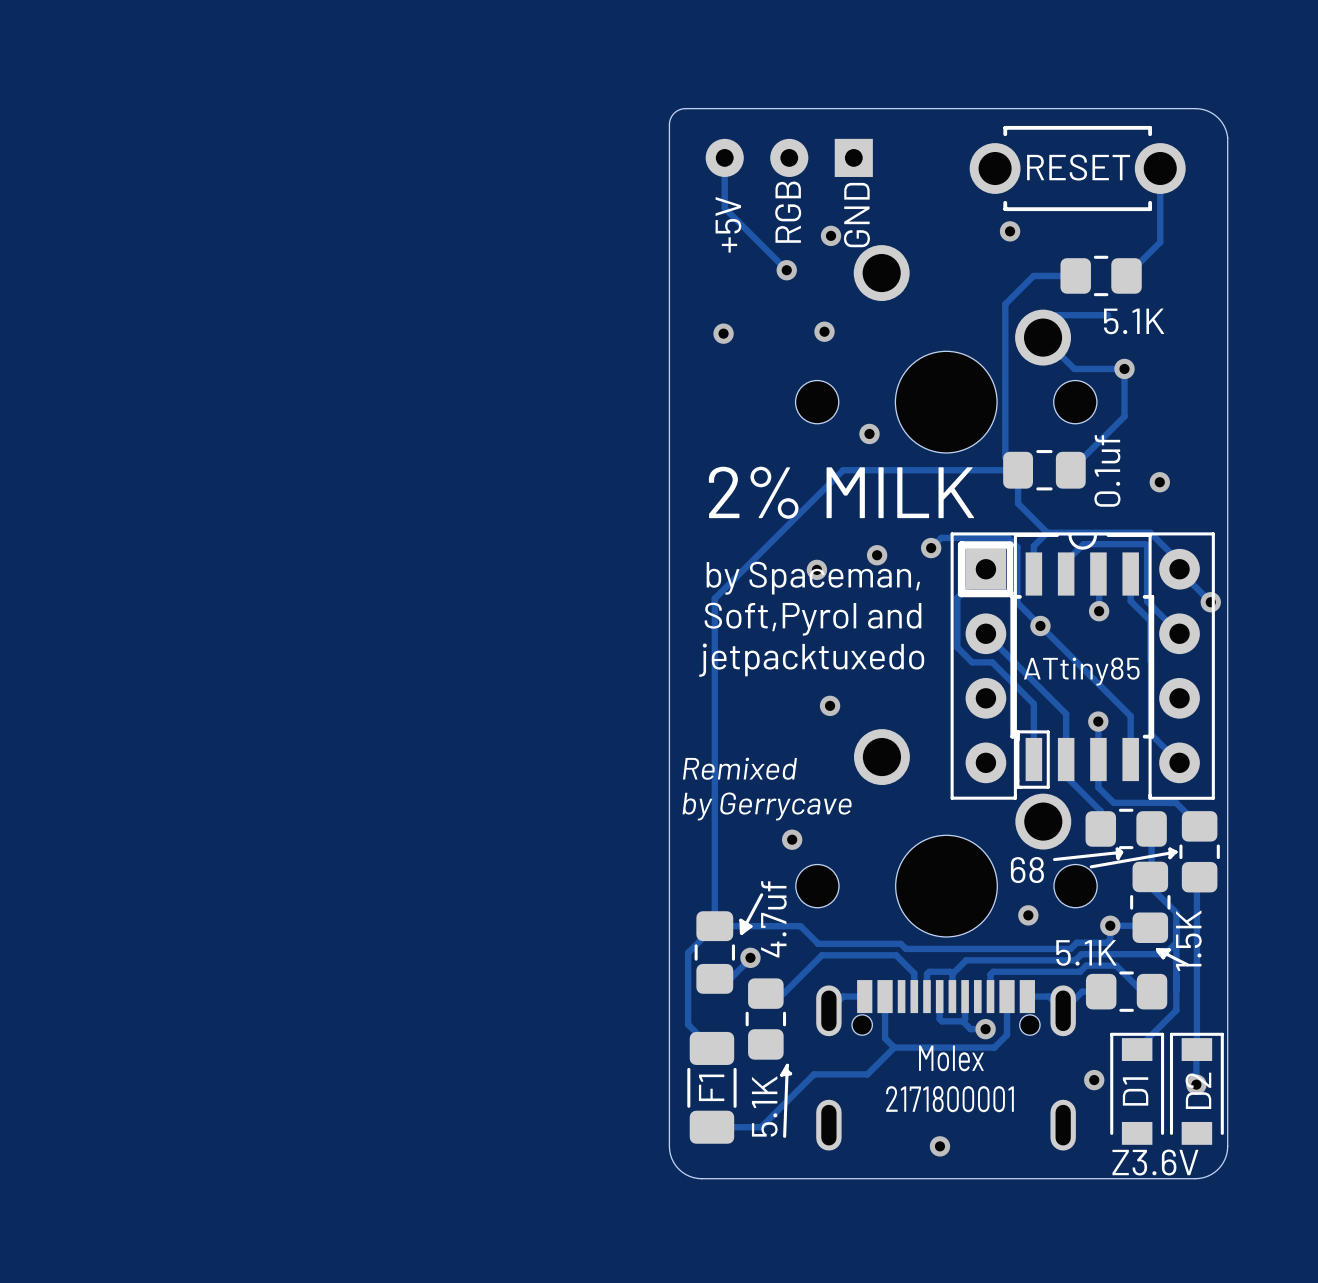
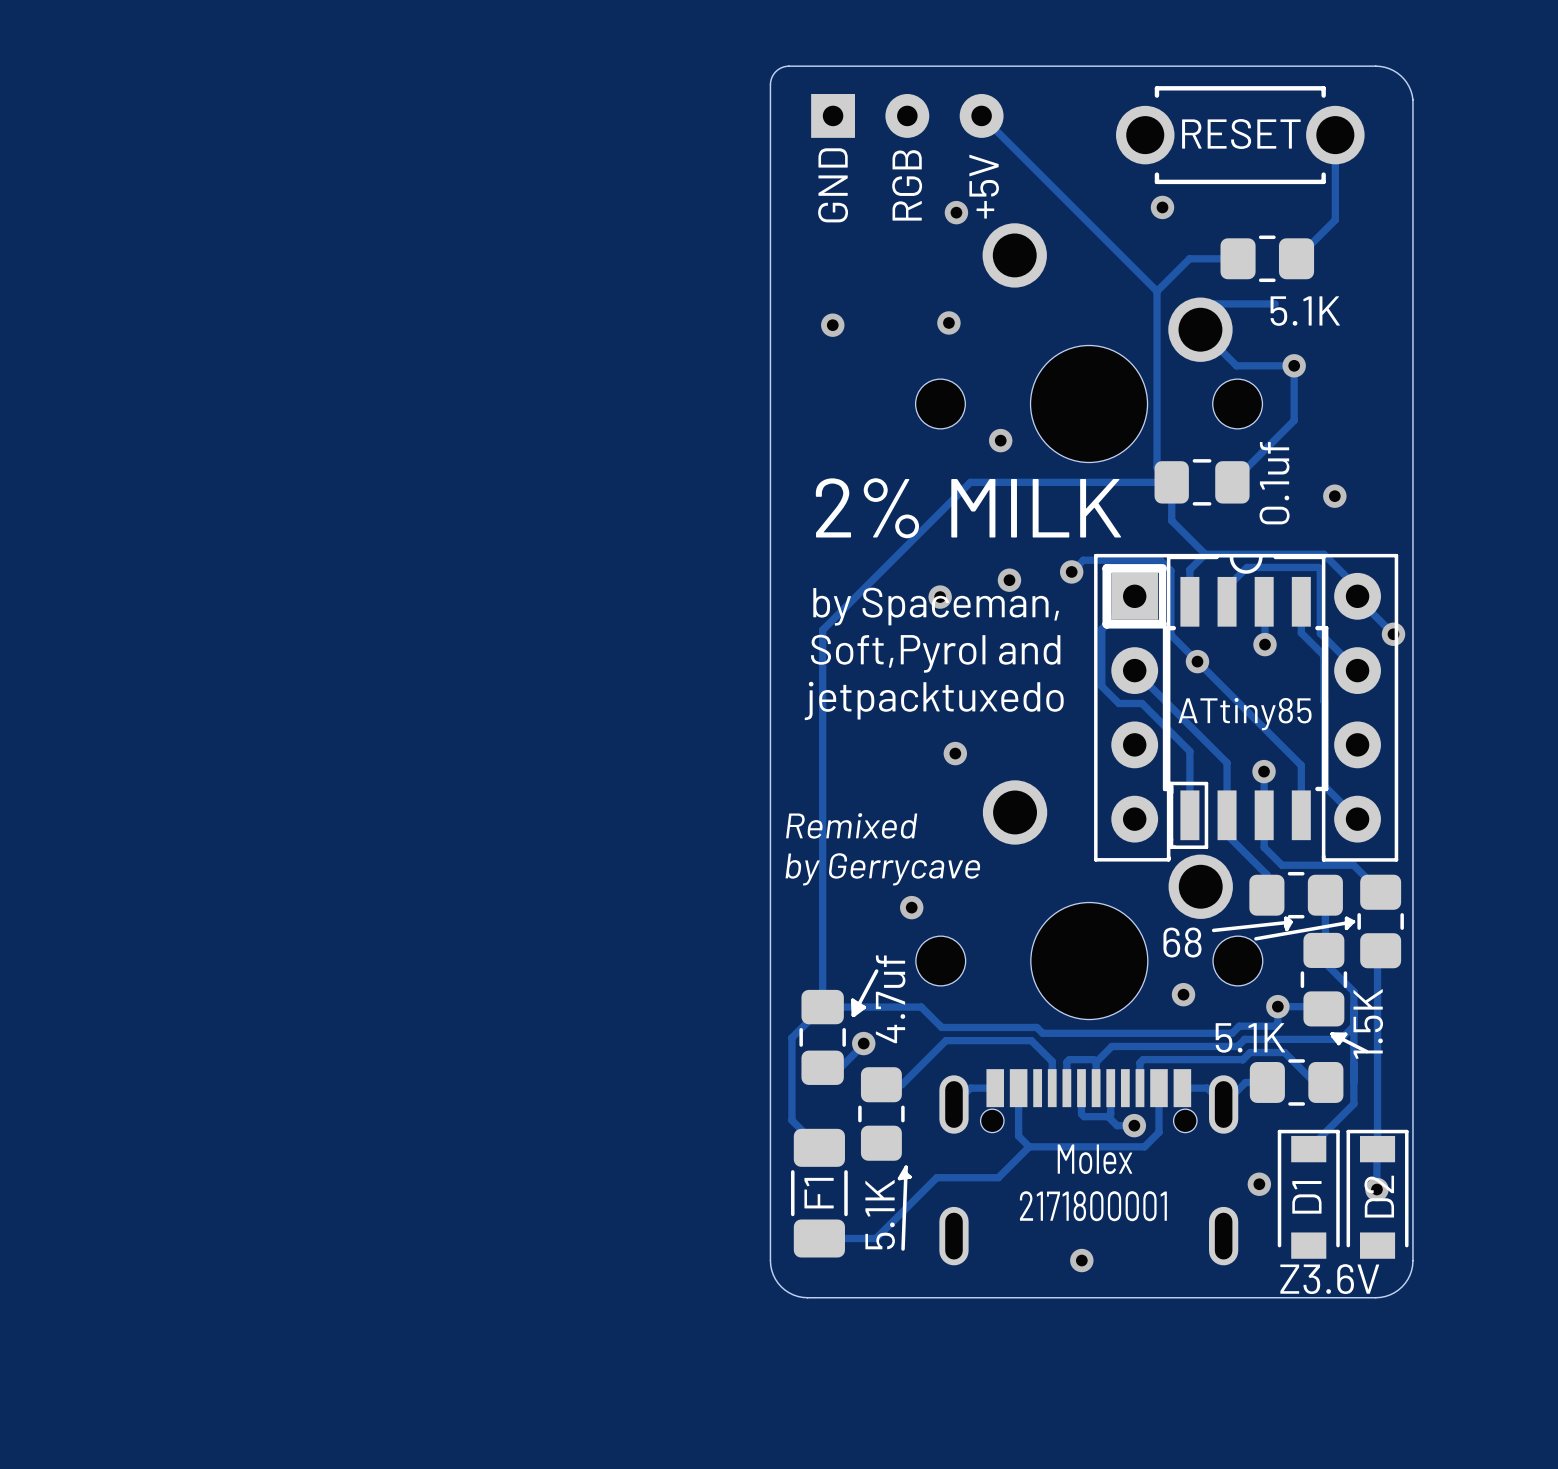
track: none -> (981, 115) (1157, 291)
track: (724, 157) (724, 208) (786, 270) -> none
part rotation: 0° (789, 157) -> 180° (907, 115)
text: GND (856, 215) -> +5V (984, 186)
text: +5V (728, 224) -> GND (833, 185)
via: (786, 270) -> none

